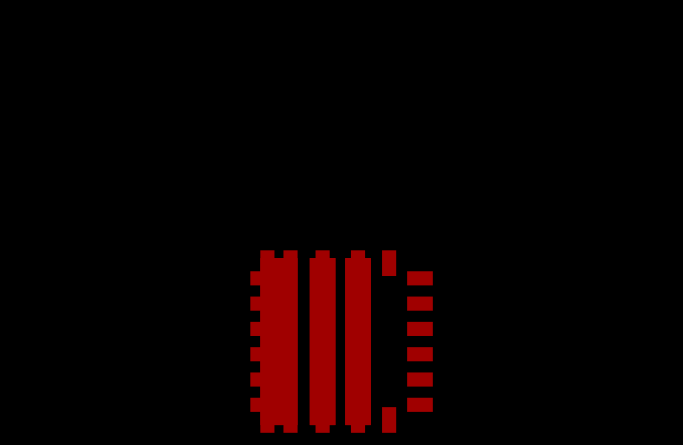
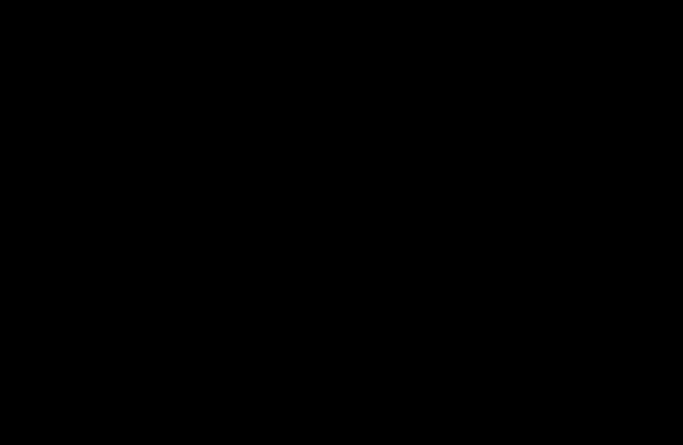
part: (341, 341) -> none

